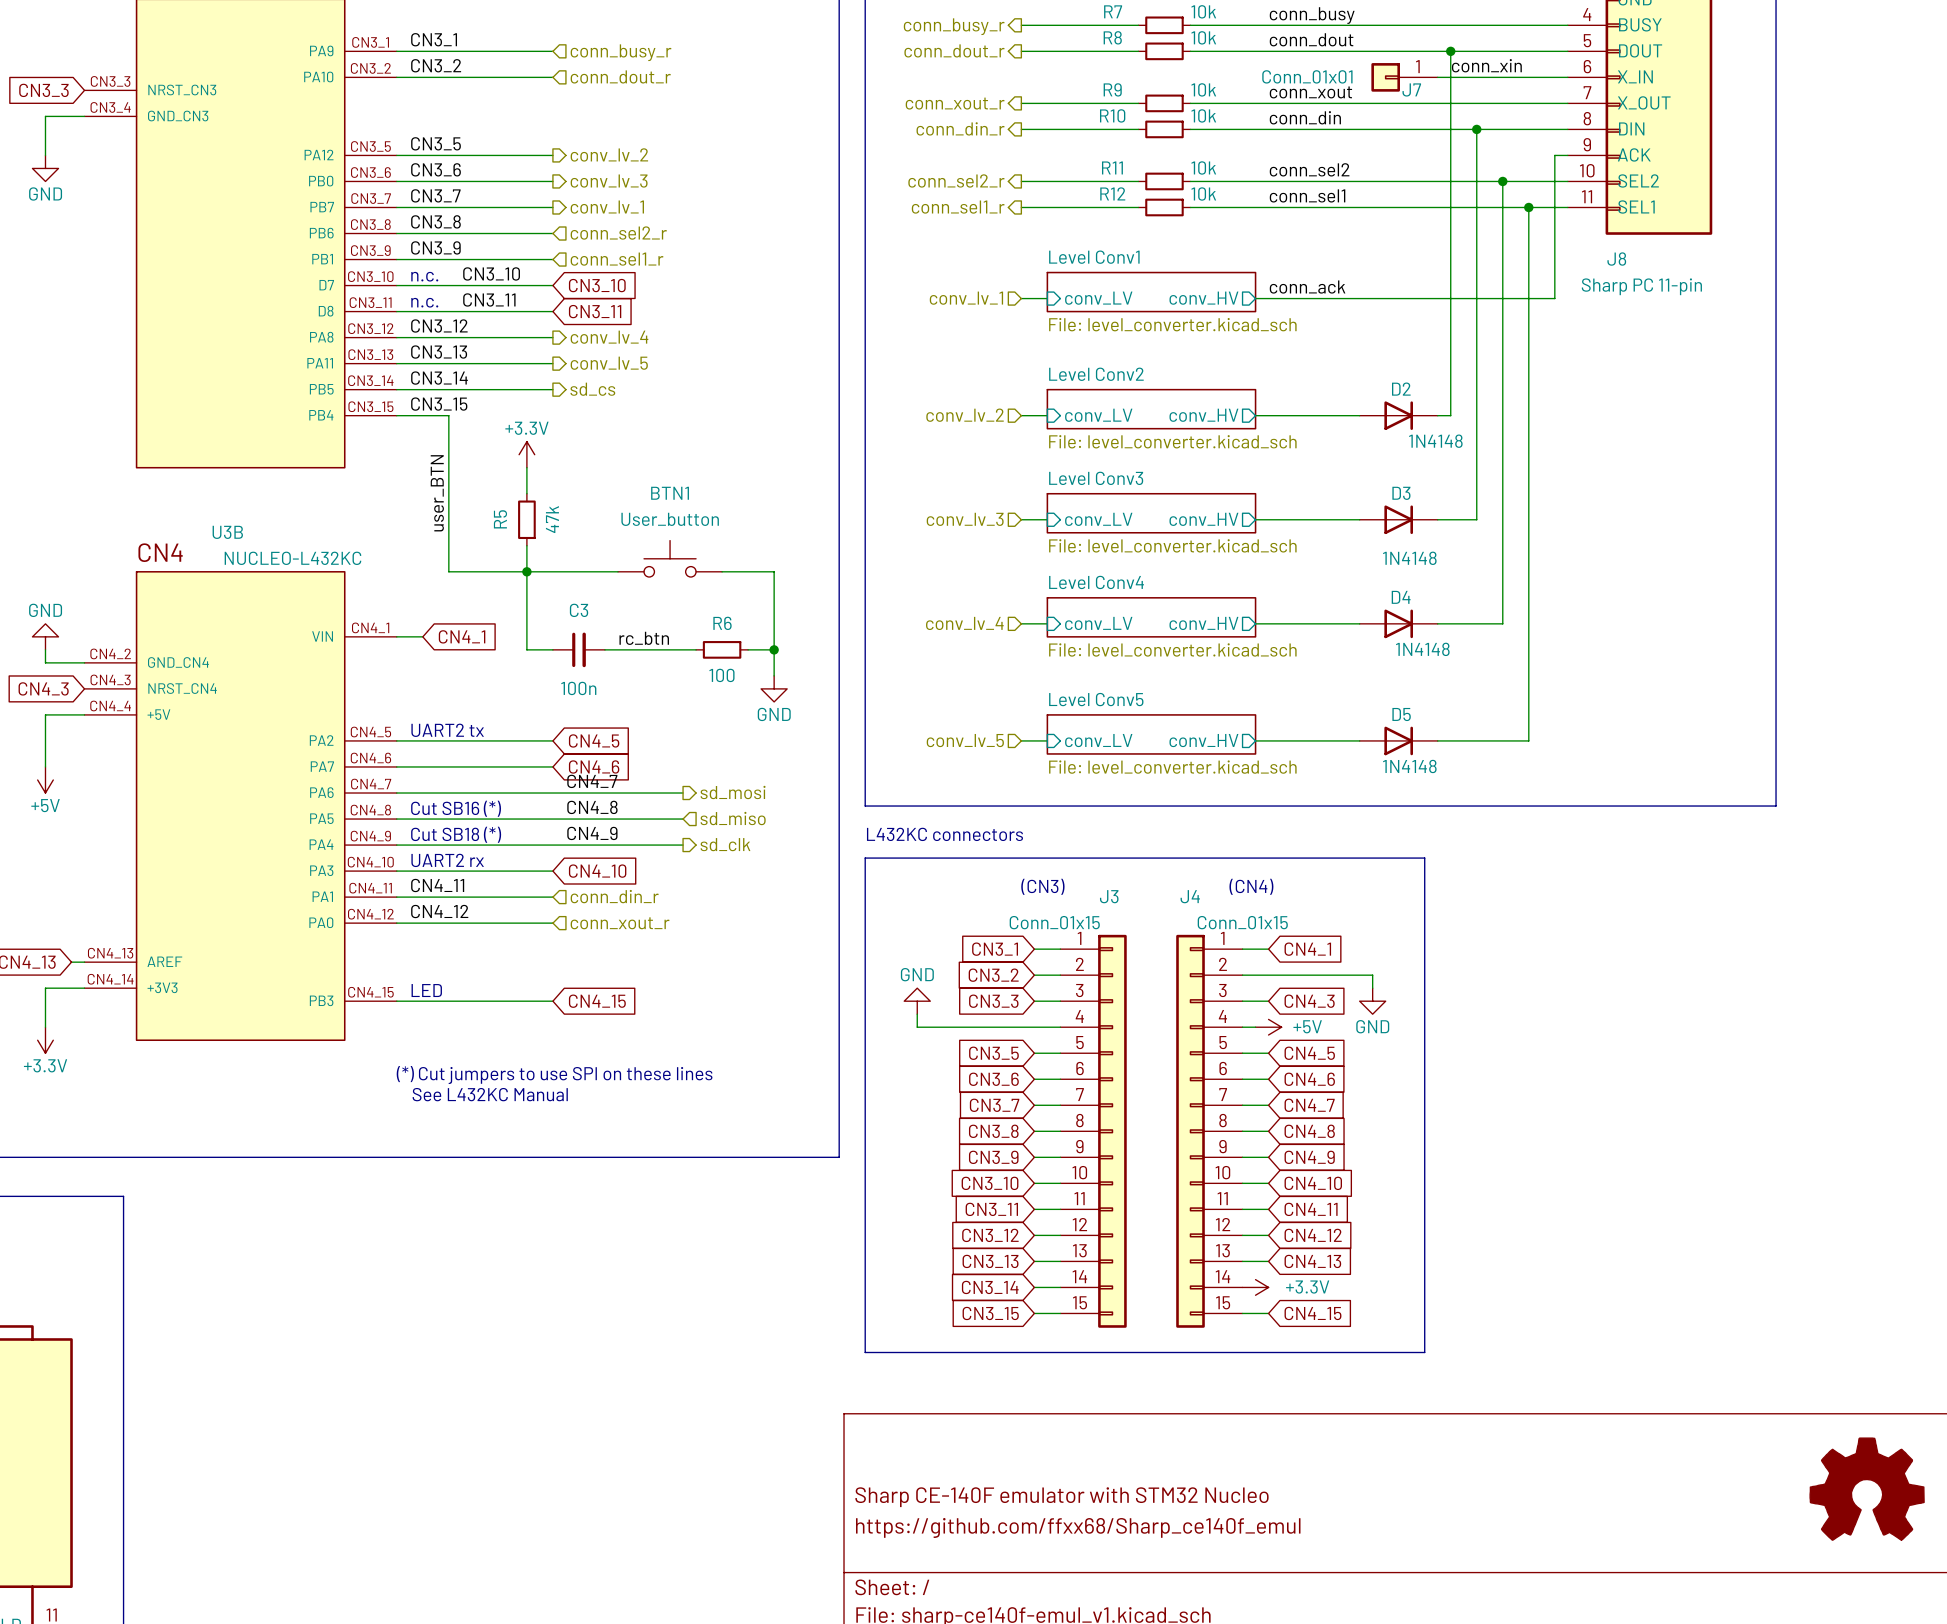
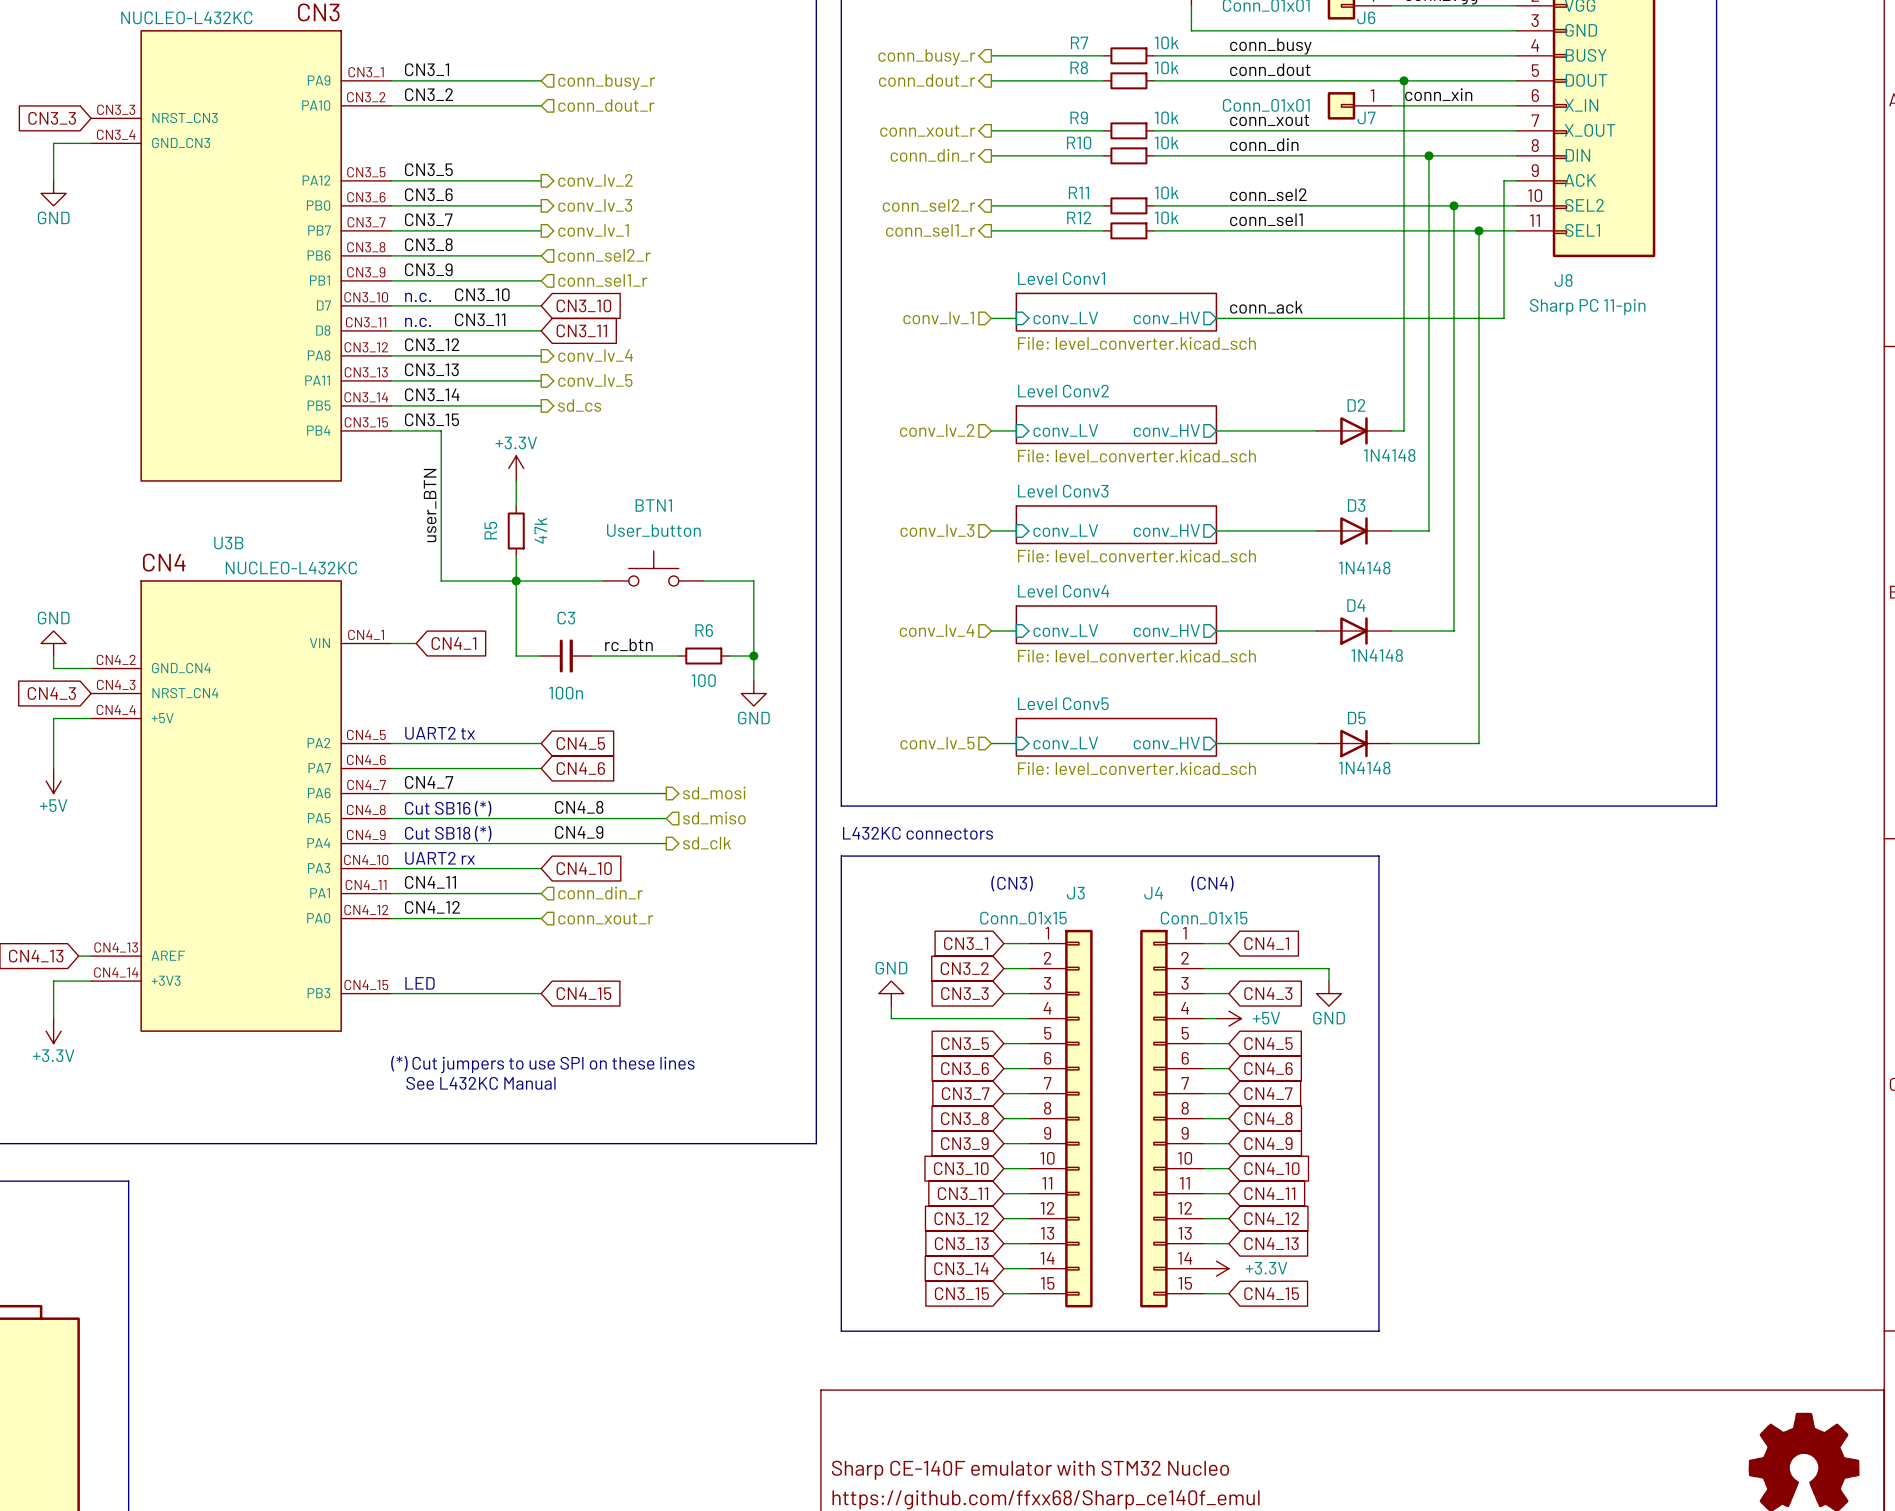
label position: CN4_7 (592, 781) -> CN4_7 (429, 782)

